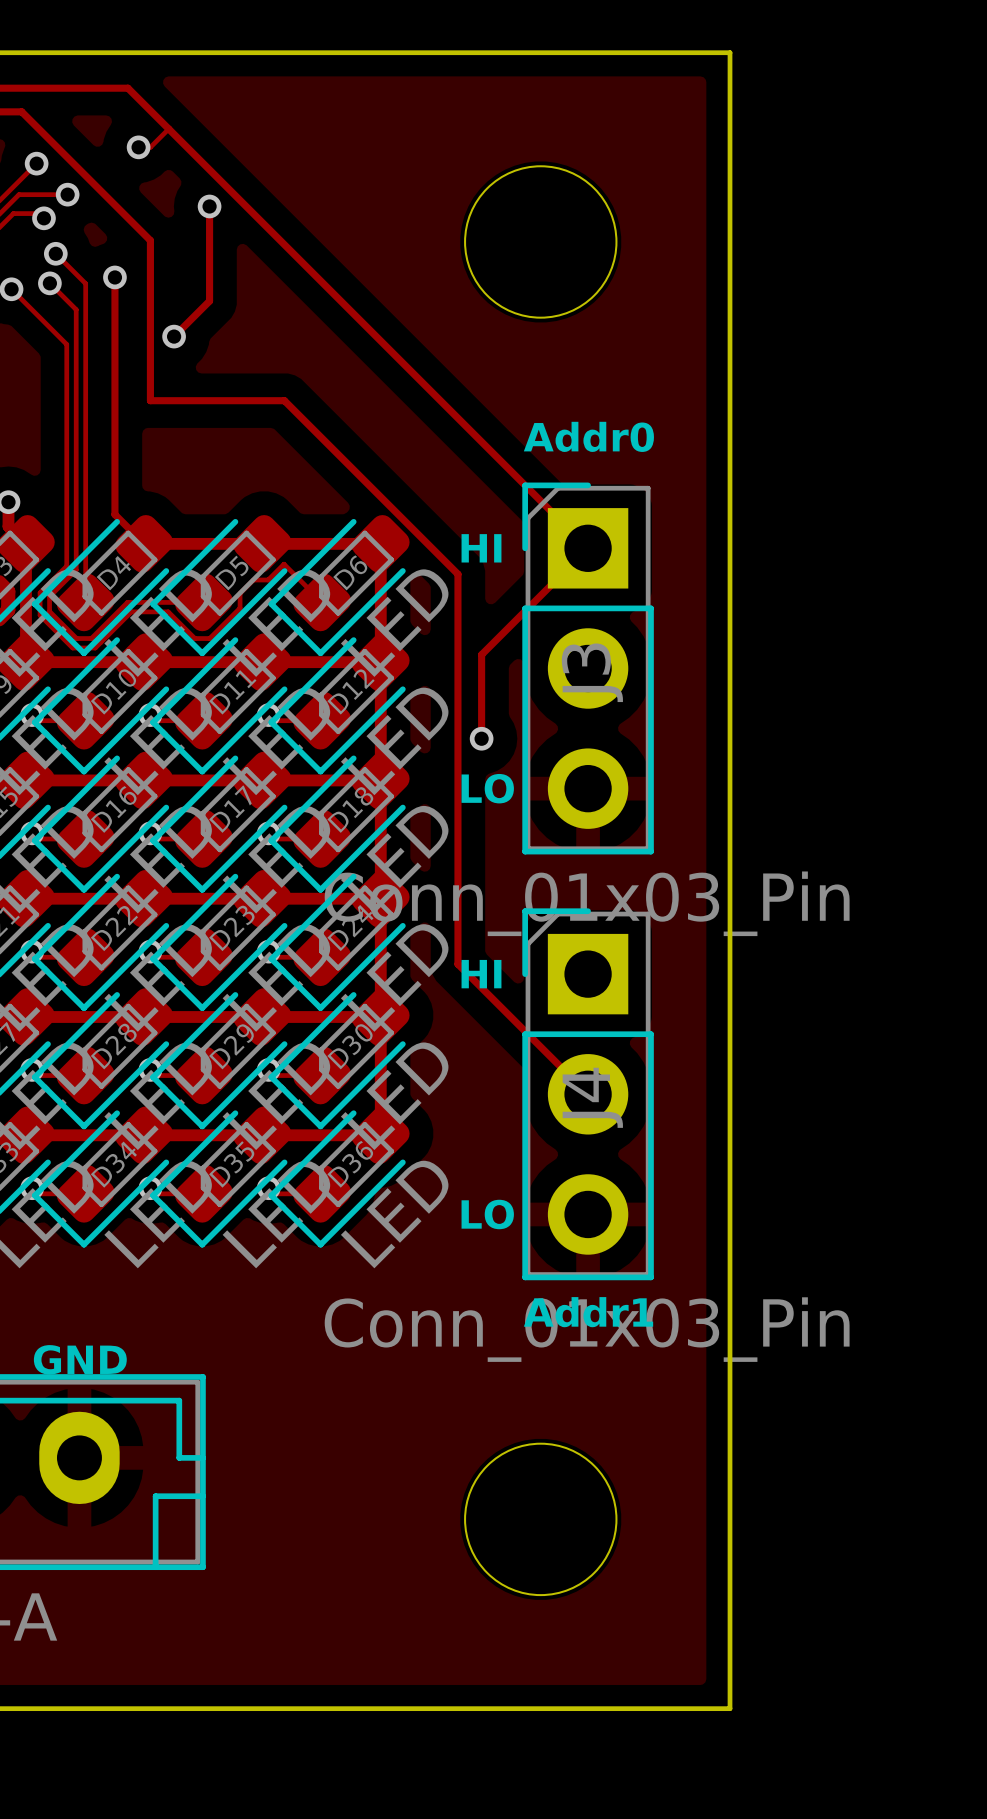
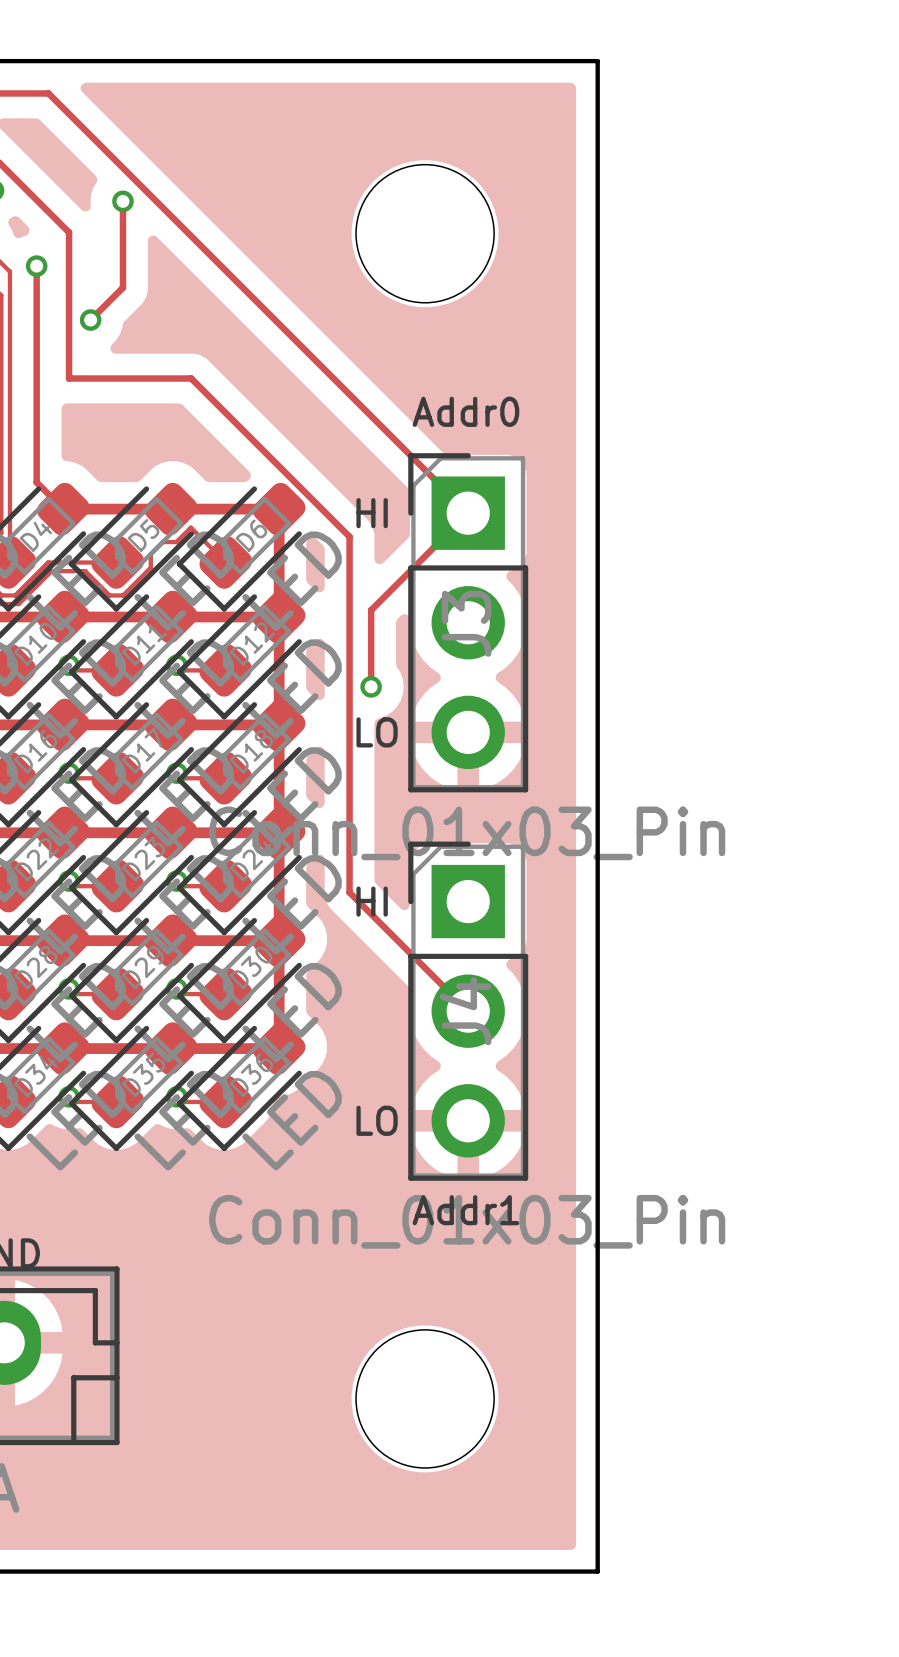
track: (168, 129) (150, 147) (138, 147) -> none
via: (138, 147) -> none

